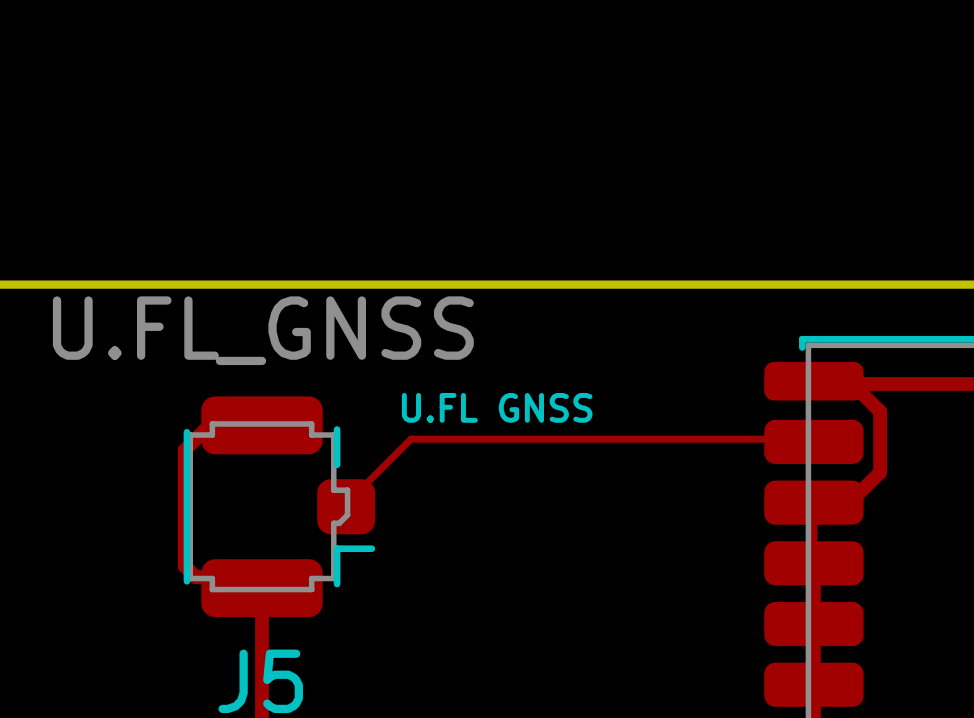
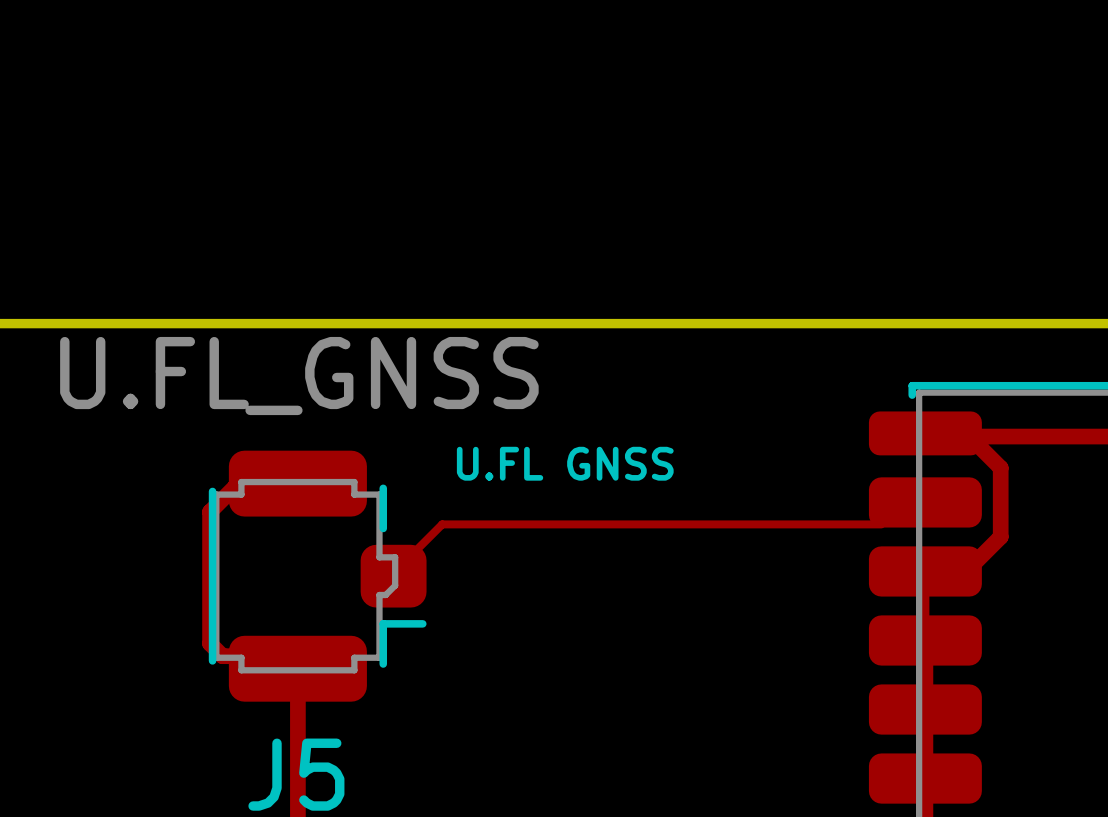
top track: (813, 439) (411, 439) (388, 461) -> (881, 524) (442, 524)

